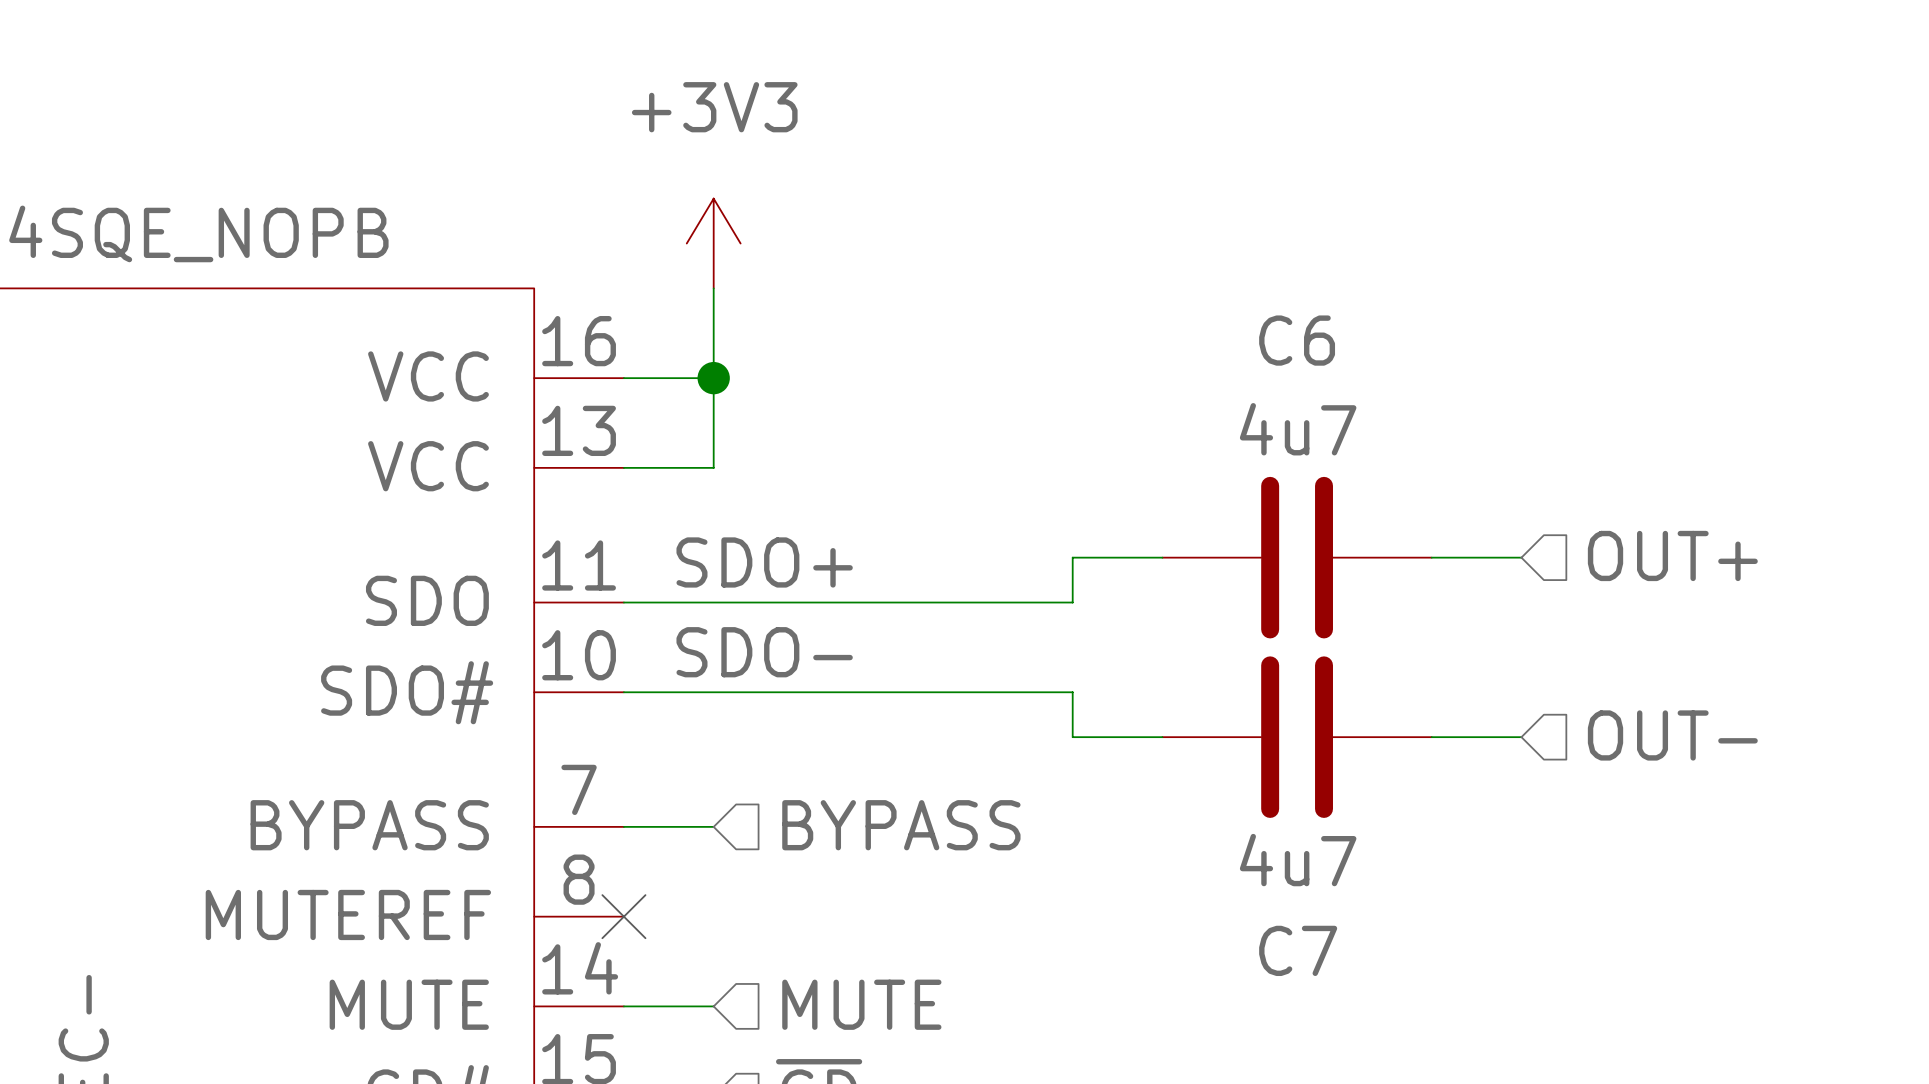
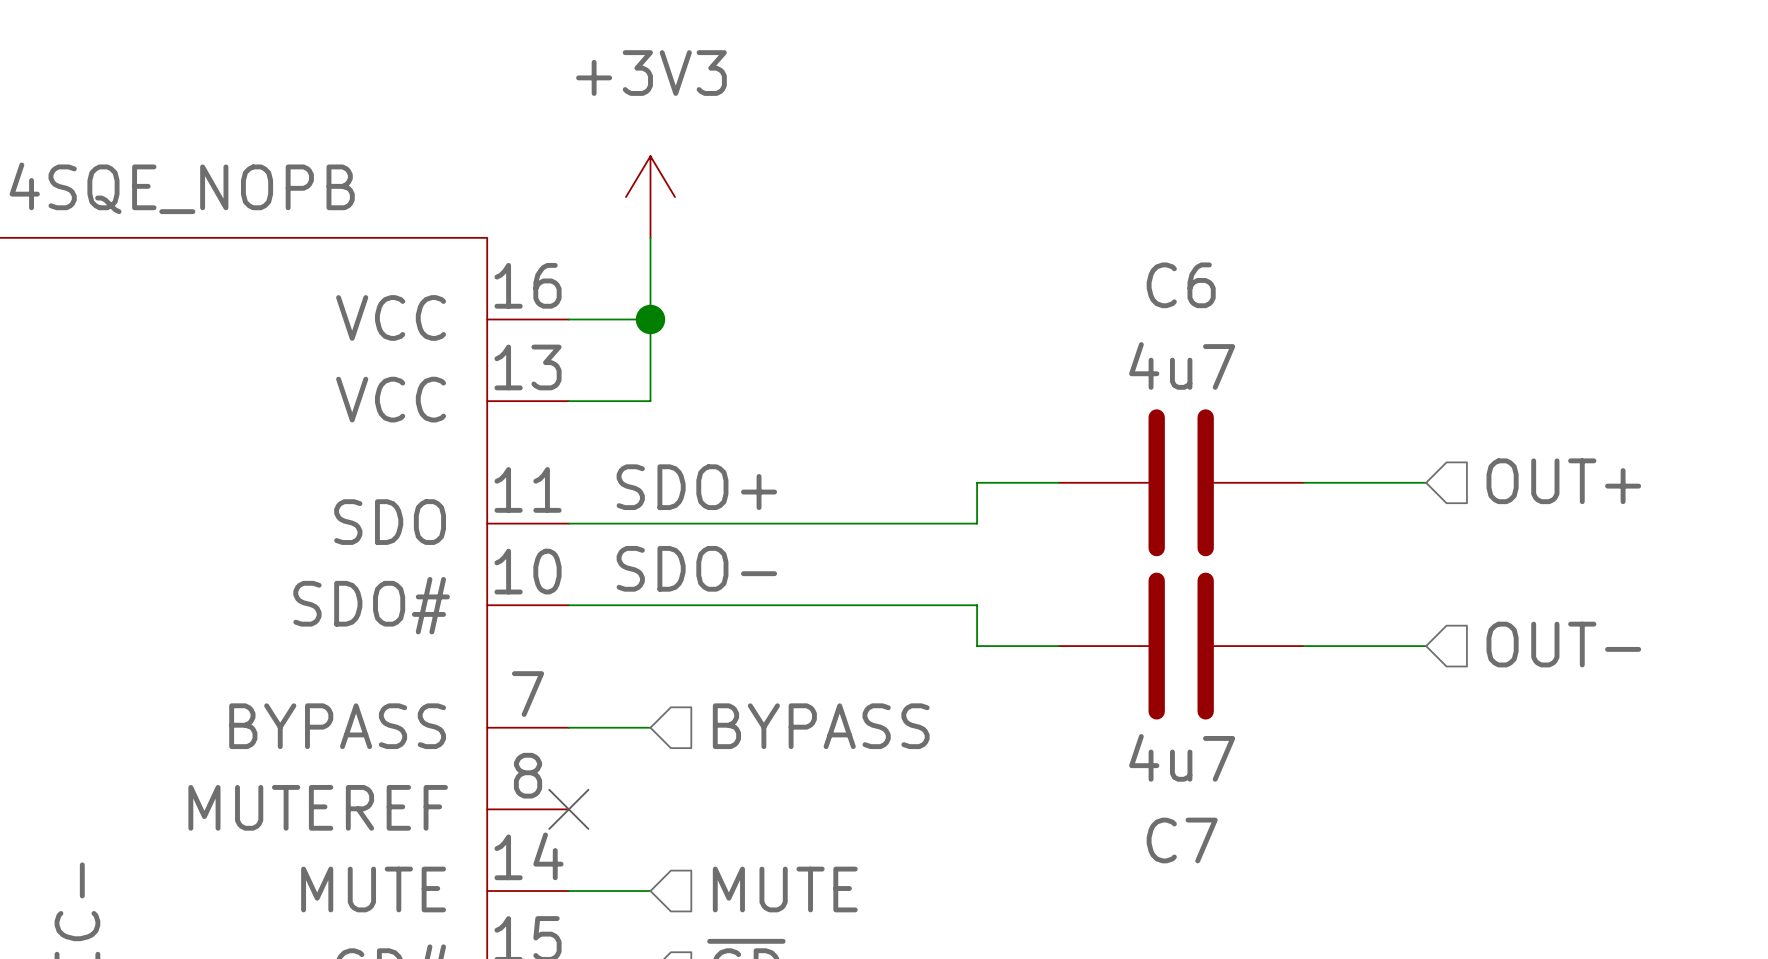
hierarchical label position: OUT+ (1672, 555) -> OUT+ (1563, 481)
wire: none -> (1385, 482) (1426, 482)
hierarchical label position: OUT- (1672, 735) -> OUT- (1563, 644)
wire: none -> (1385, 646) (1426, 646)

